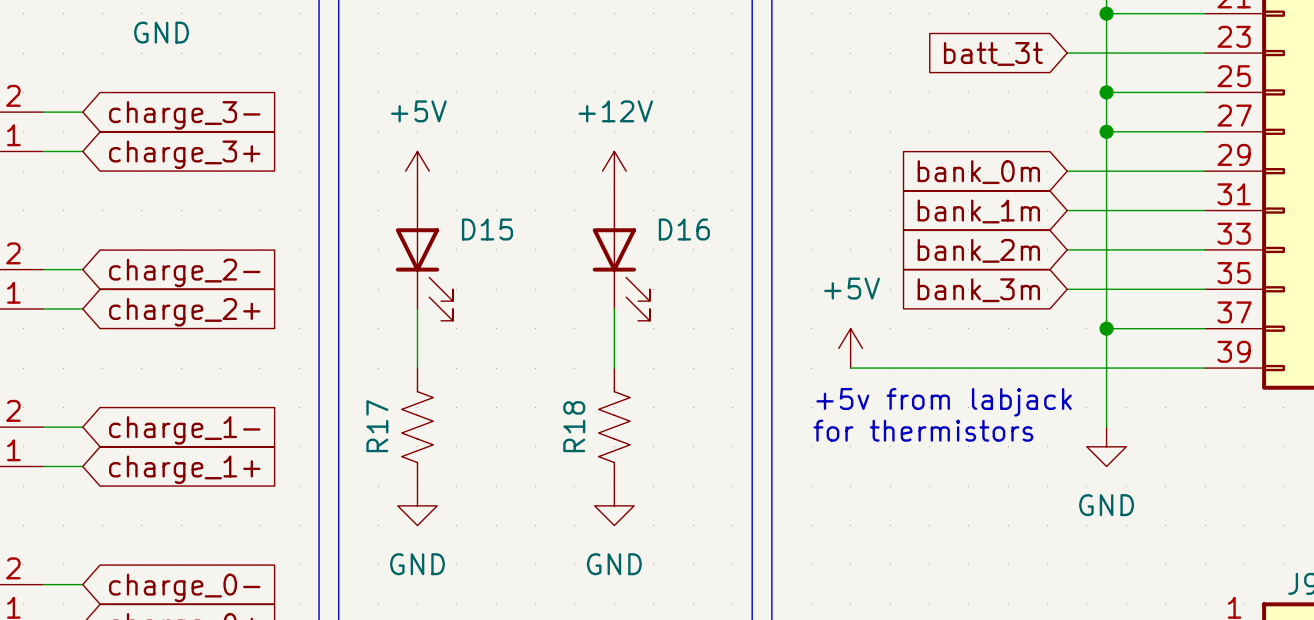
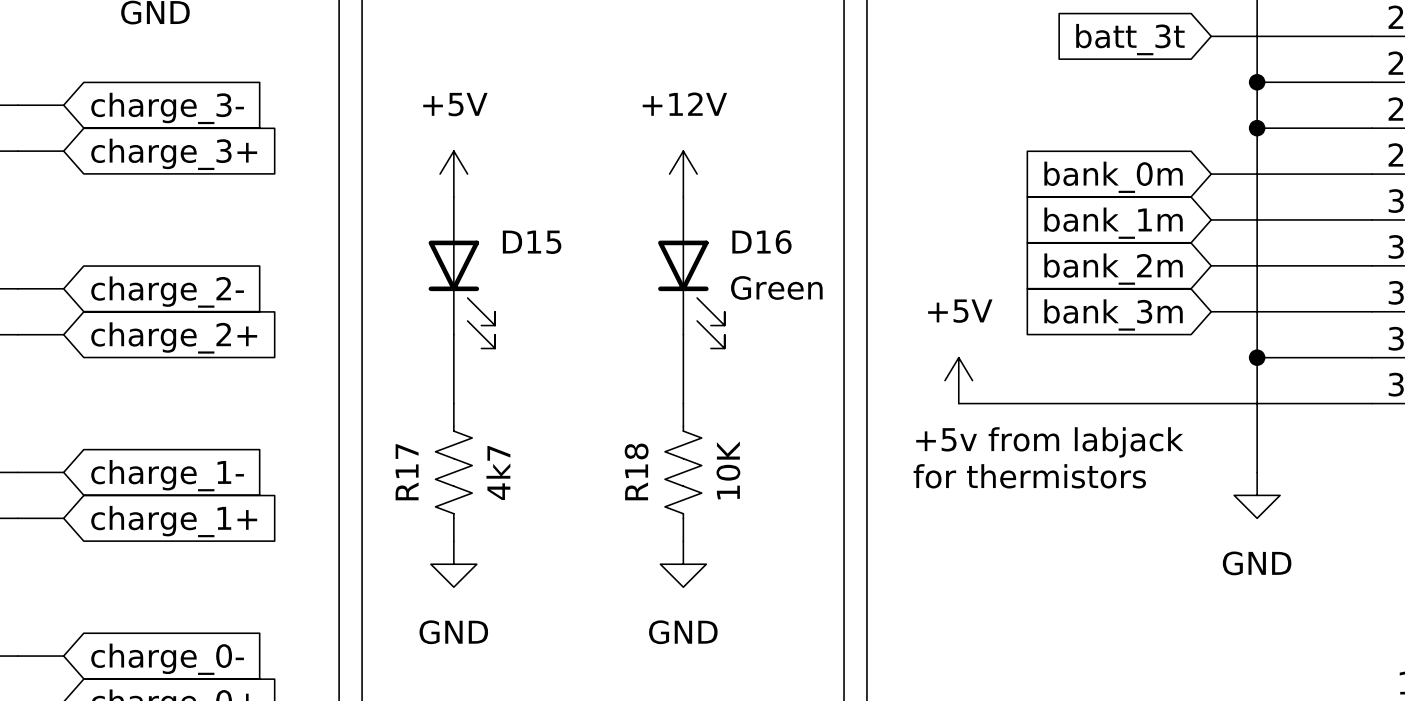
D16 value: none -> Green (776, 287)
R17 value: none -> 4k7 (498, 473)
R18 value: none -> 10K (728, 470)

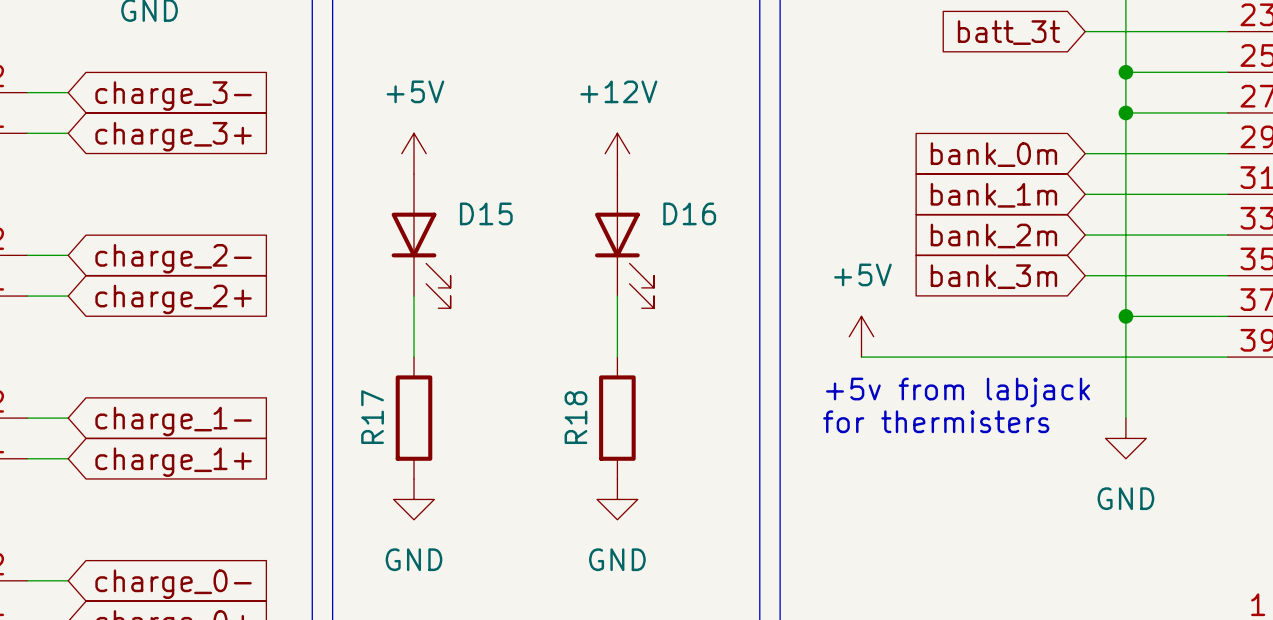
D16 value: Green (776, 287) -> none
R17 symbol: [435, 403, 473, 542] -> [395, 357, 433, 480]
R18 symbol: [665, 403, 702, 542] -> [599, 357, 636, 480]
R18 value: 10K (728, 470) -> none
R17 value: 4k7 (498, 473) -> none
text: for thermistors (1029, 476) -> for thermisters (936, 421)

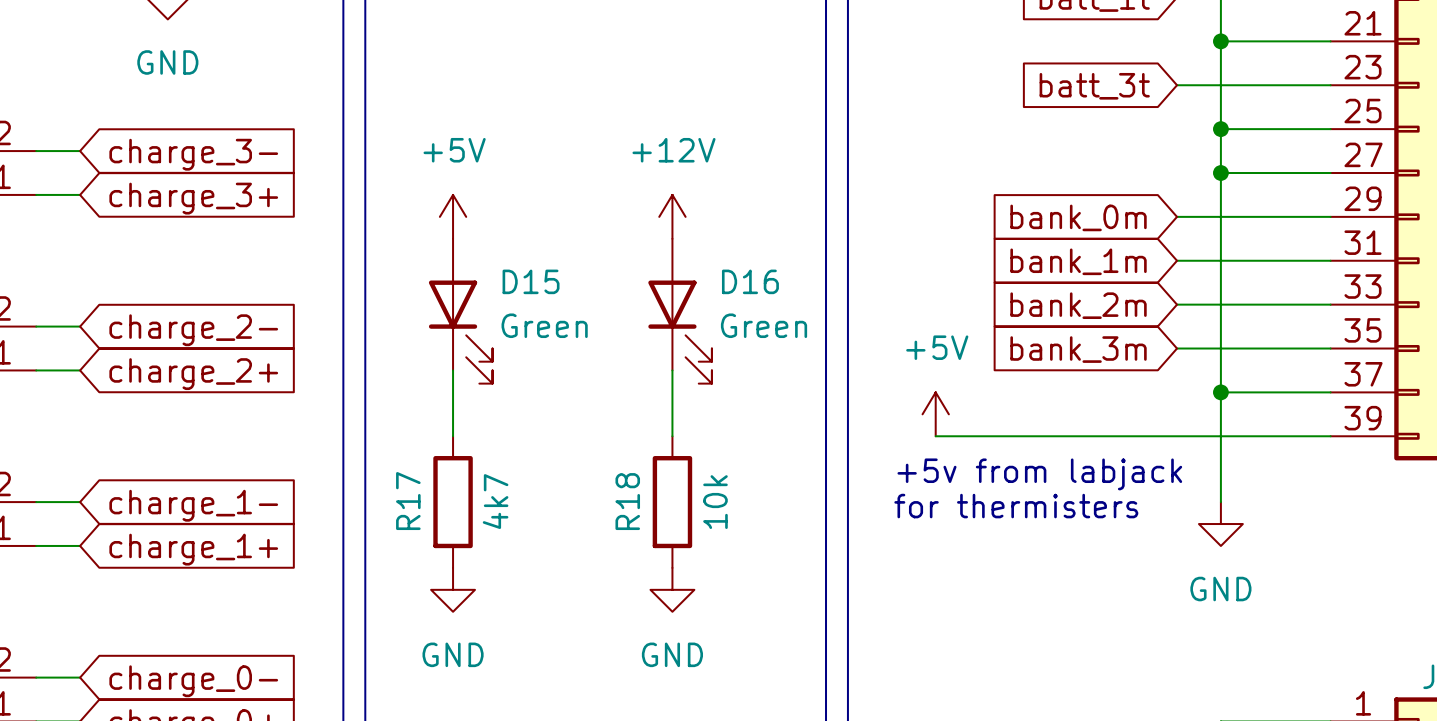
D15 value: none -> Green (544, 325)
D16 value: none -> Green (764, 325)
R17 value: none -> 4k7 (495, 501)
R18 value: none -> 10k (715, 502)

